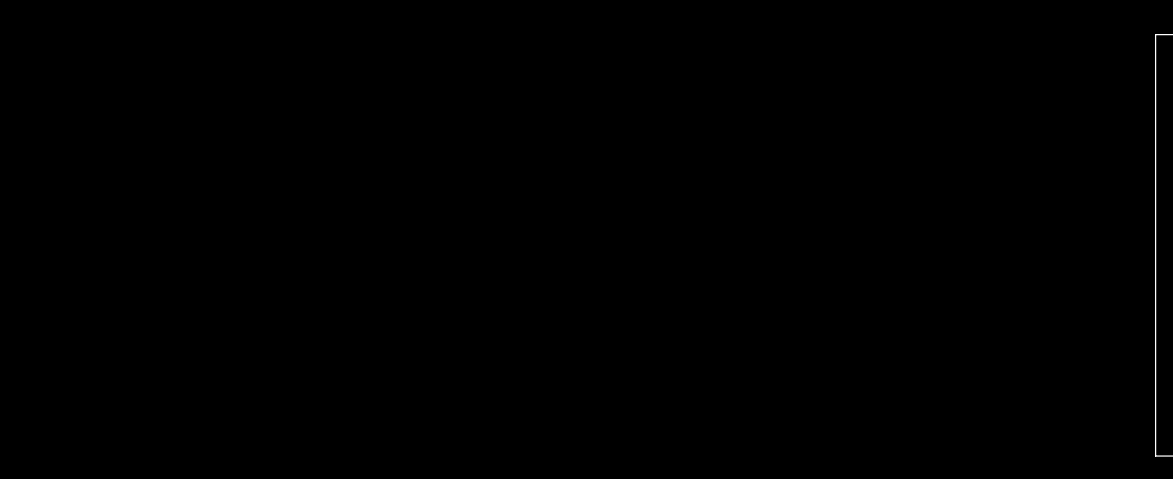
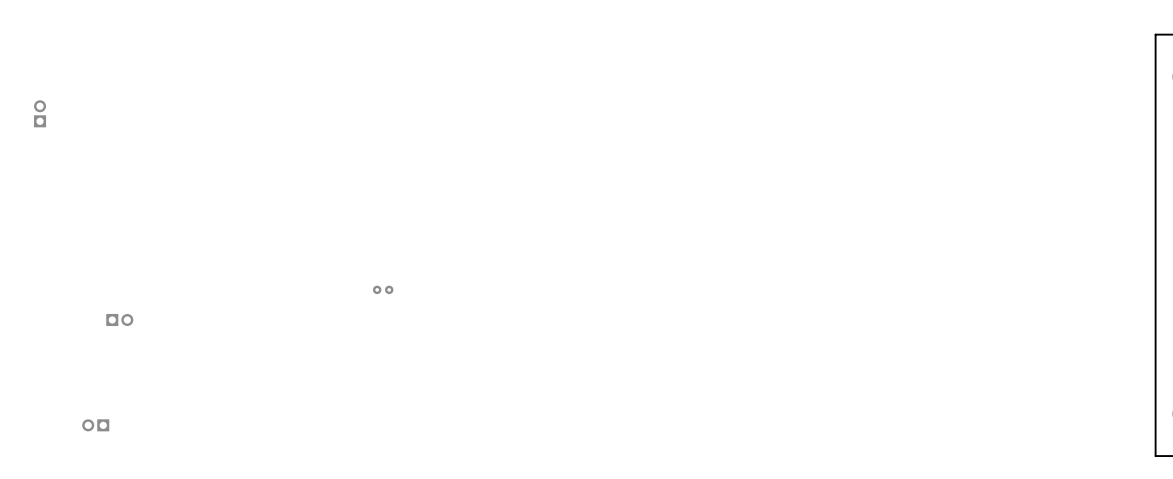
part: none -> (40, 113)
part: none -> (383, 289)
part: none -> (119, 319)
part: none -> (95, 425)

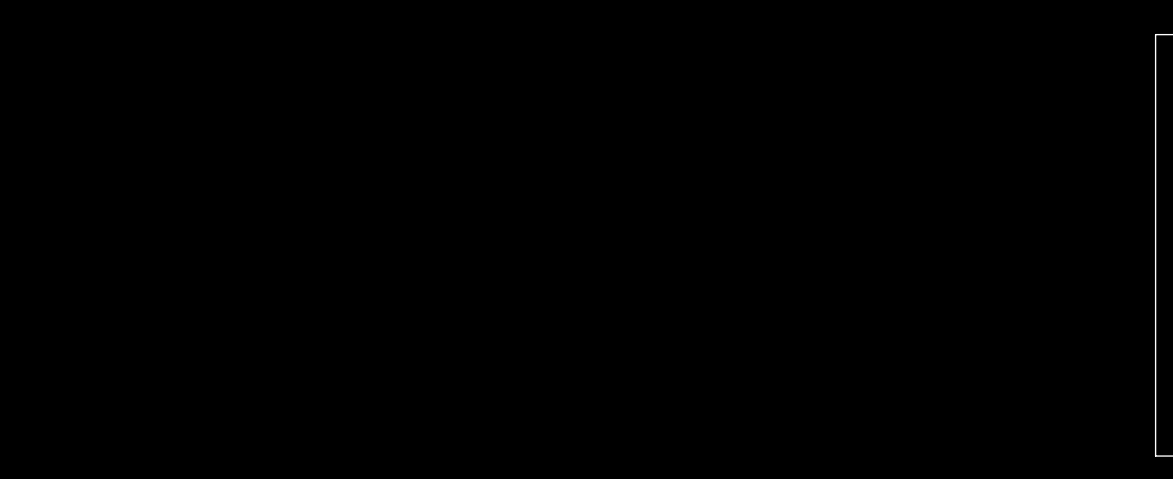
part: (40, 113) -> none
part: (383, 289) -> none
part: (119, 319) -> none
part: (95, 425) -> none

